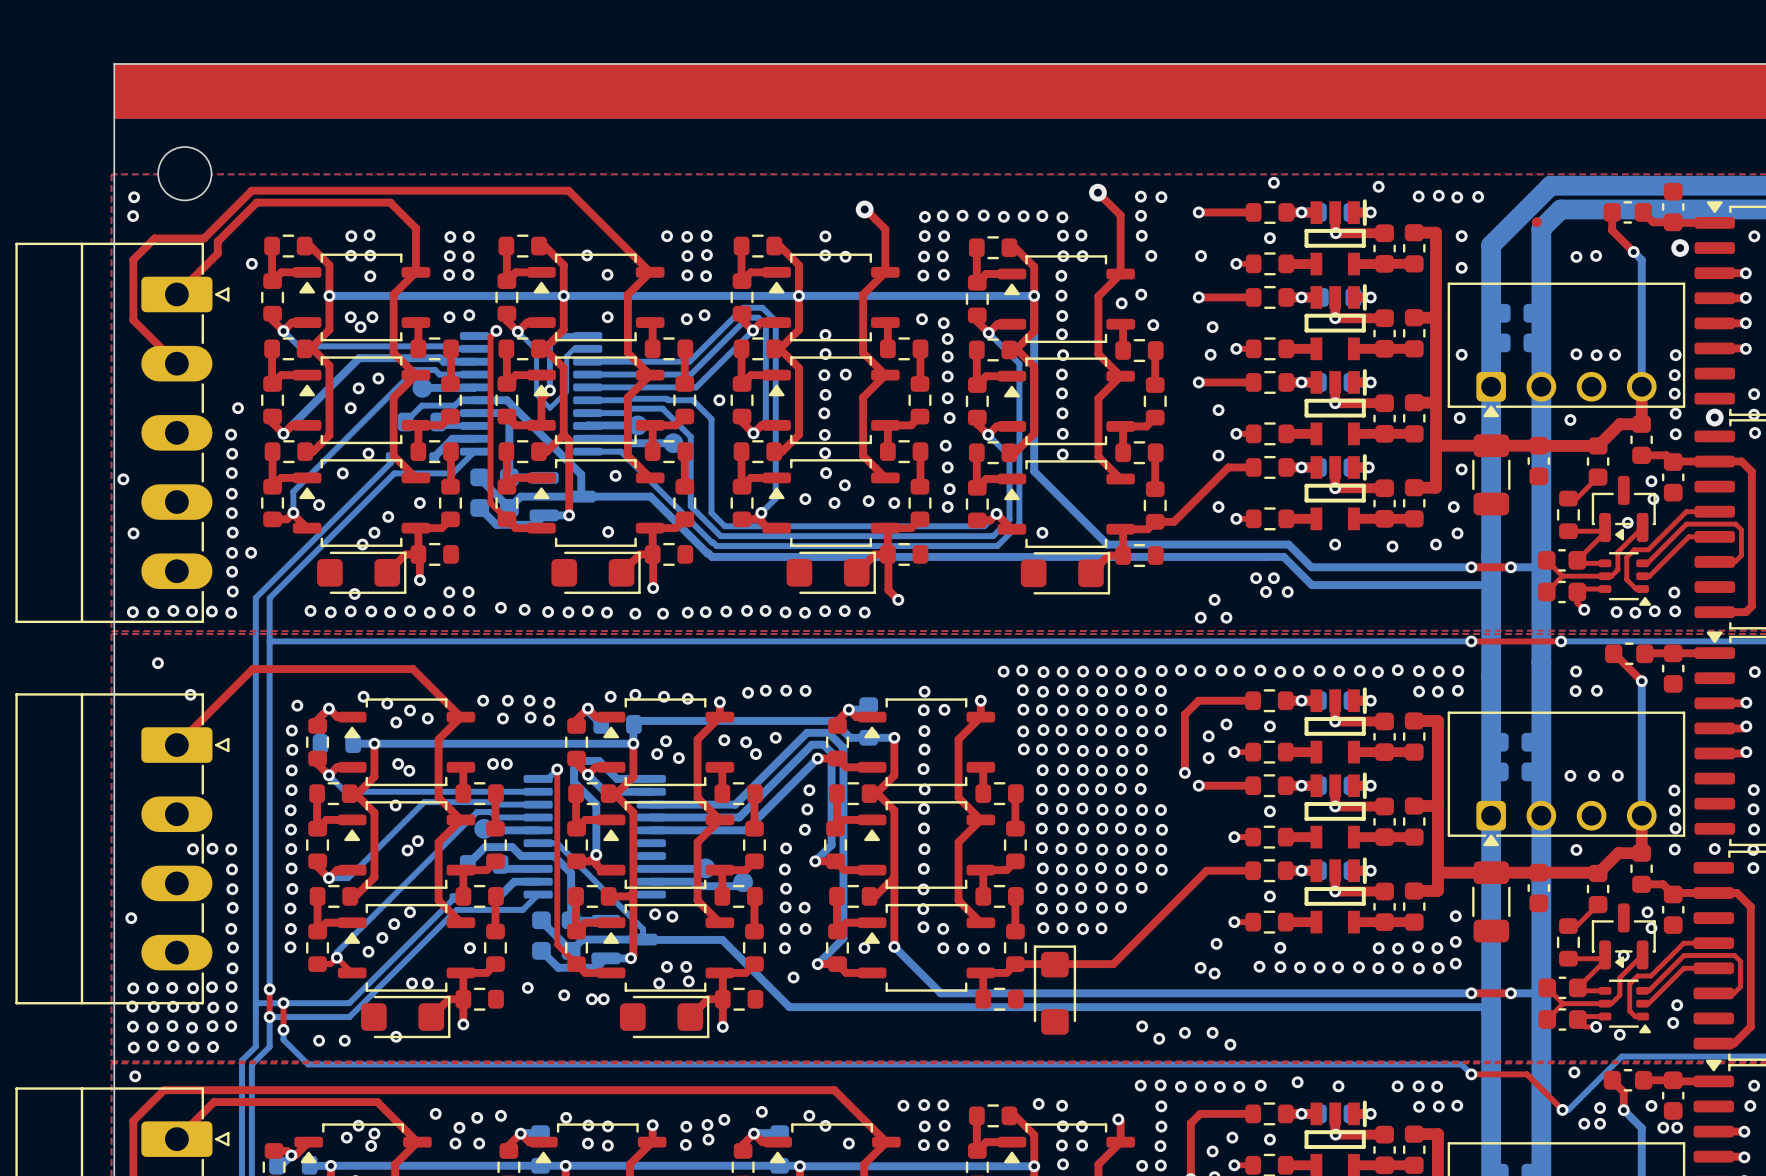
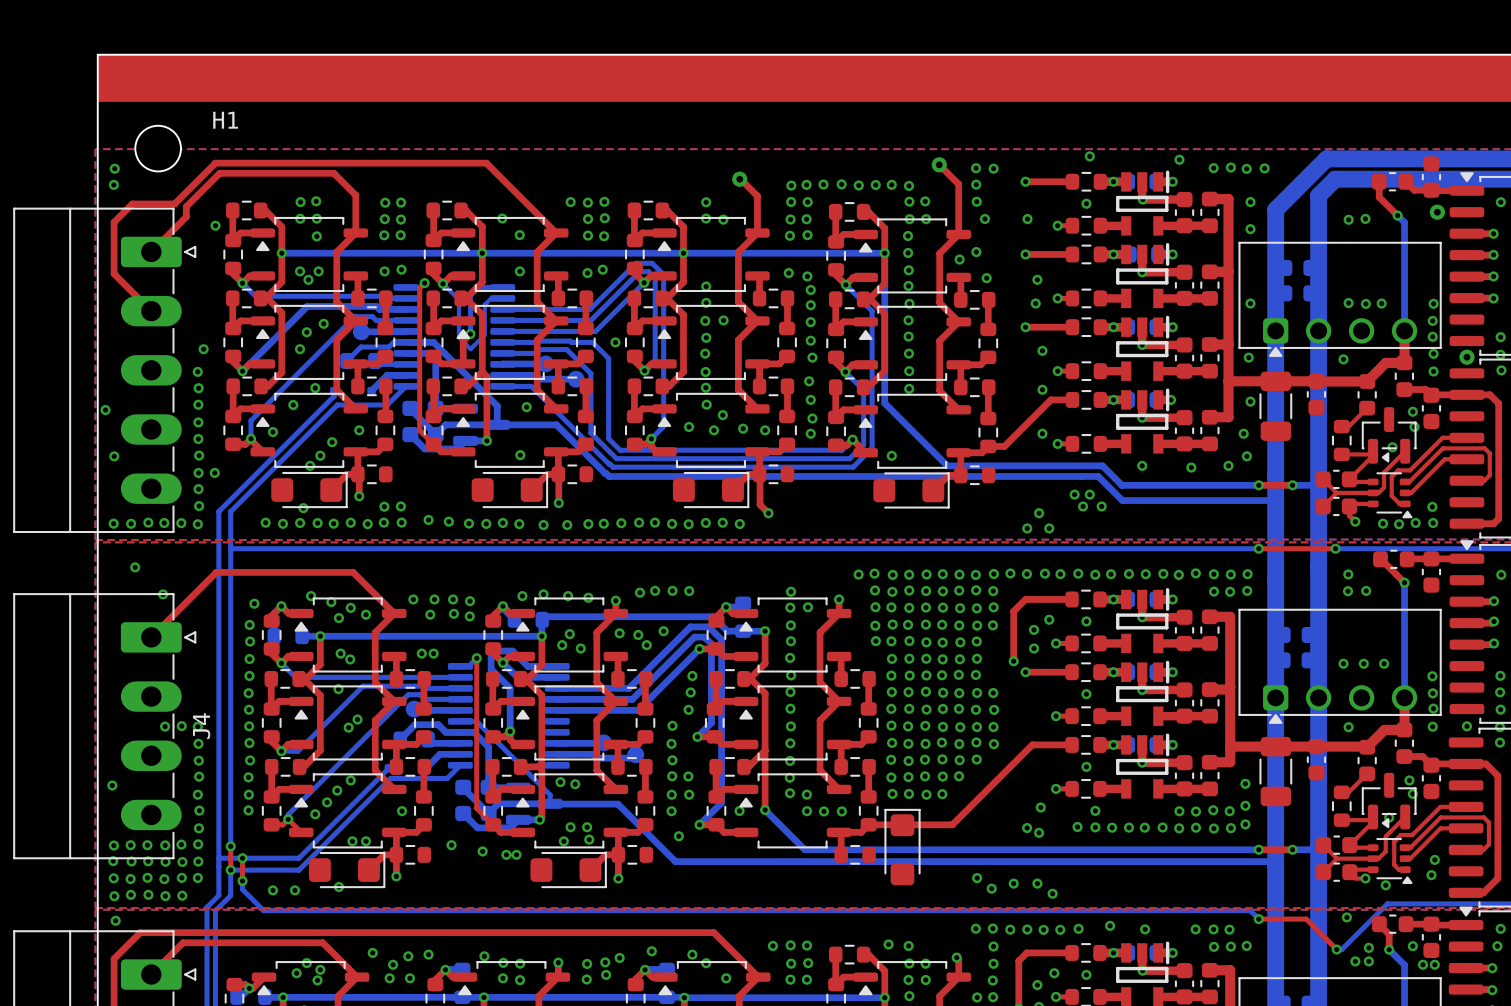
H1 name: none -> H1 (225, 120)
part: (1536, 222) -> none
J4 name: none -> J4 (201, 726)

